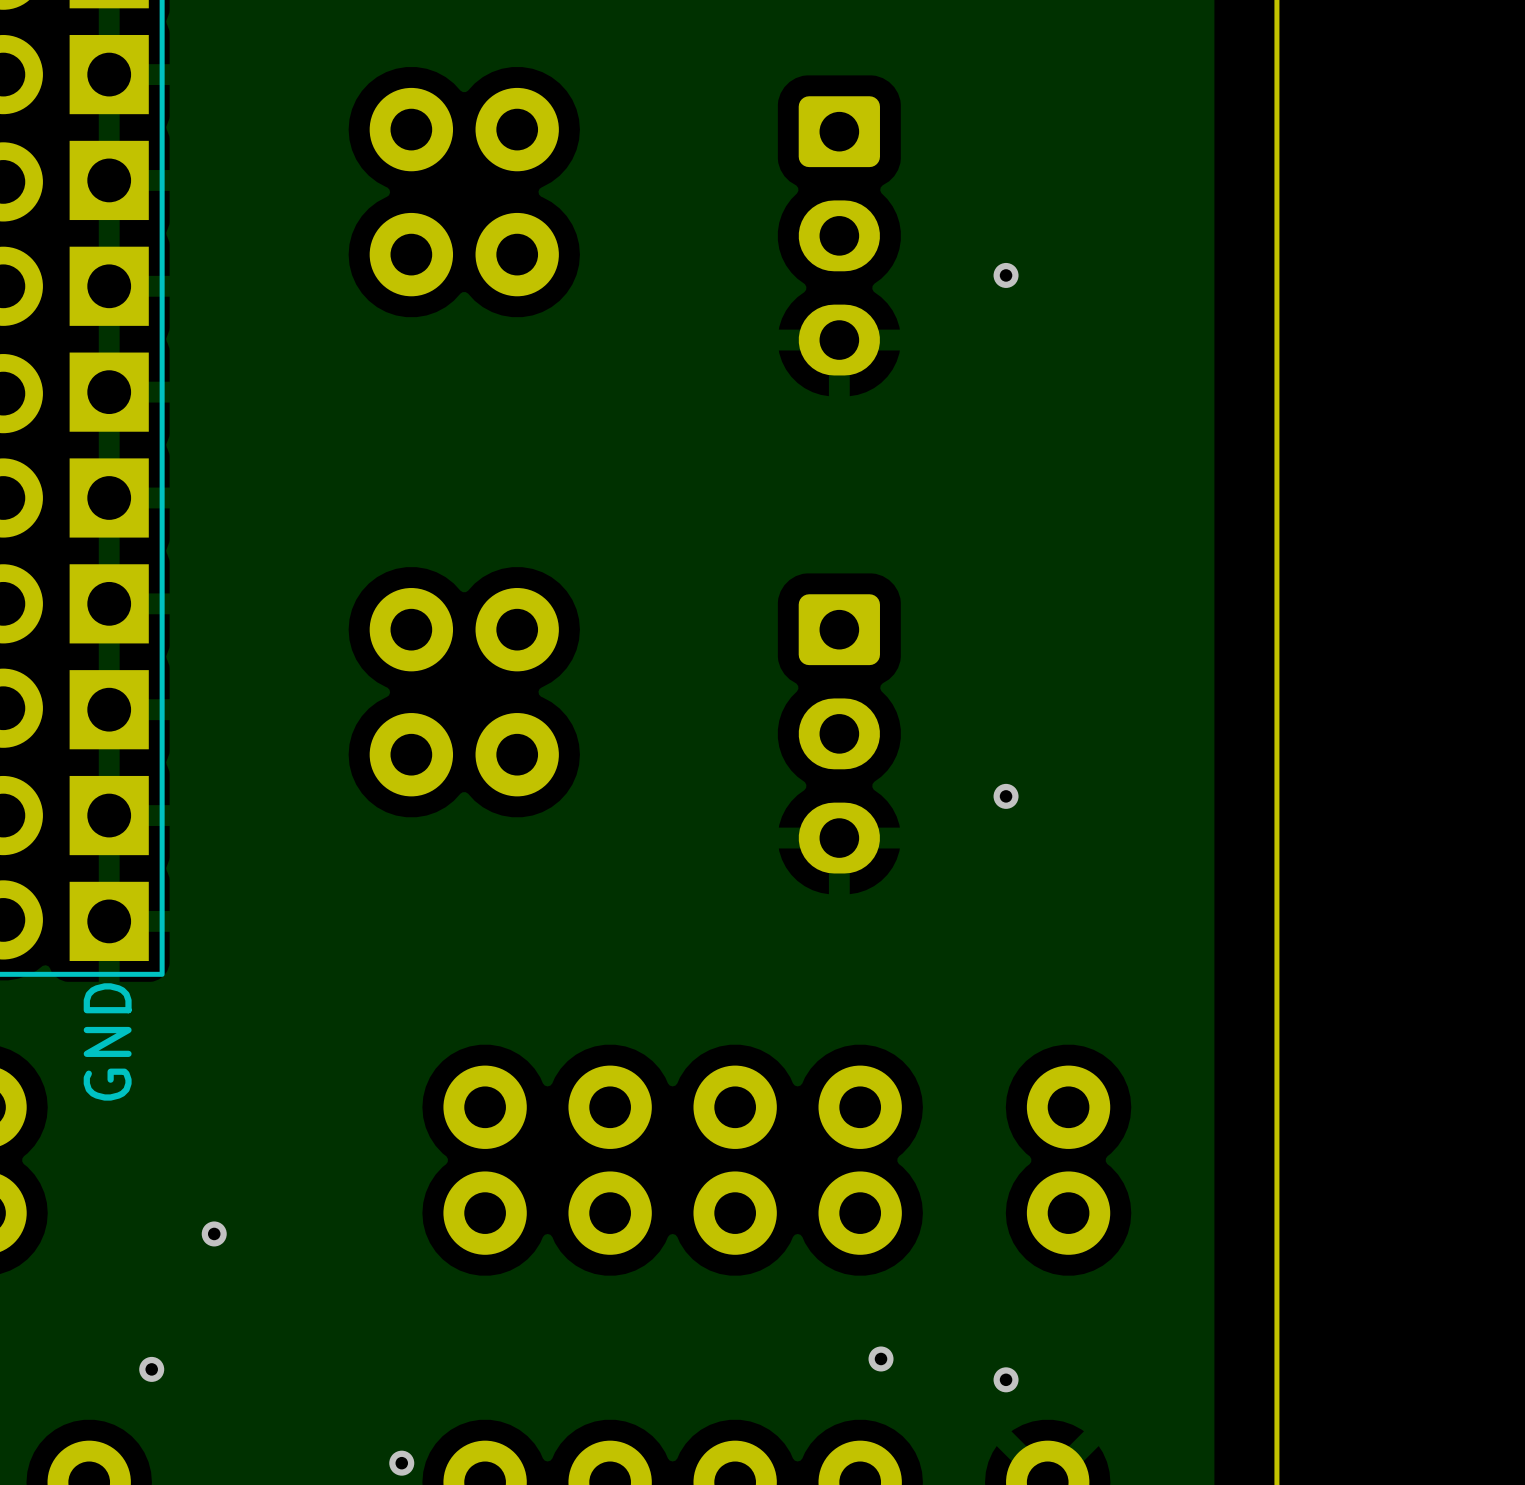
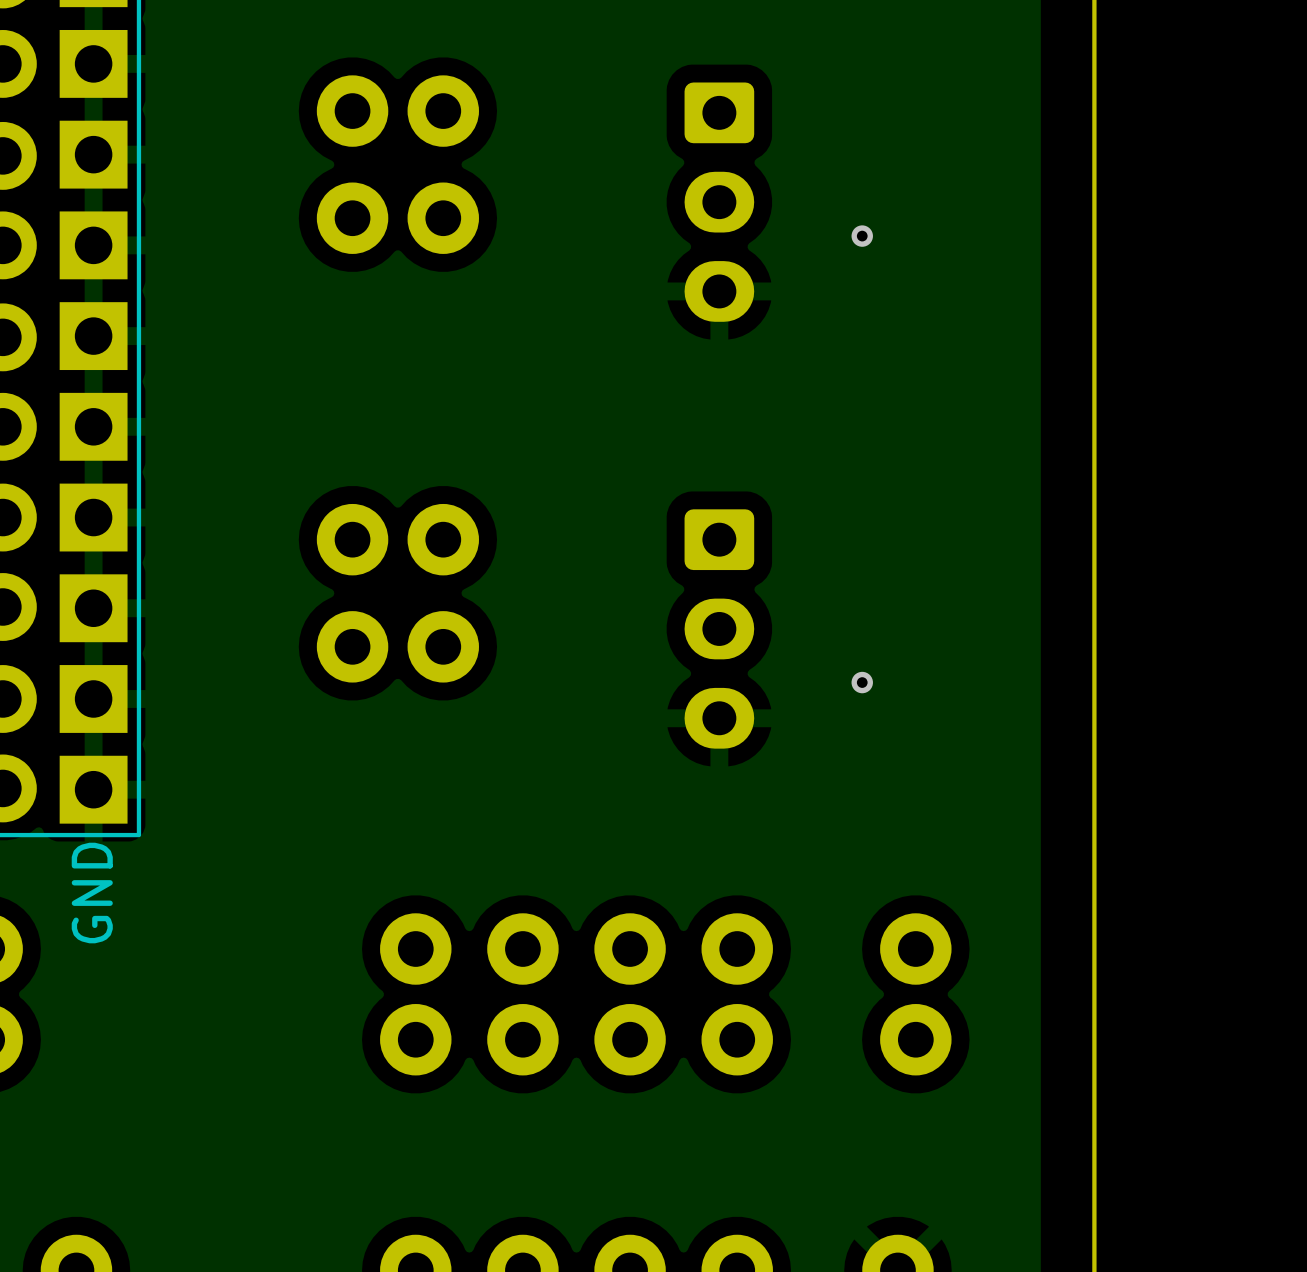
via: (214, 1233) -> none
via: (881, 1358) -> none
via: (151, 1369) -> none
via: (1006, 1379) -> none
via: (401, 1463) -> none

